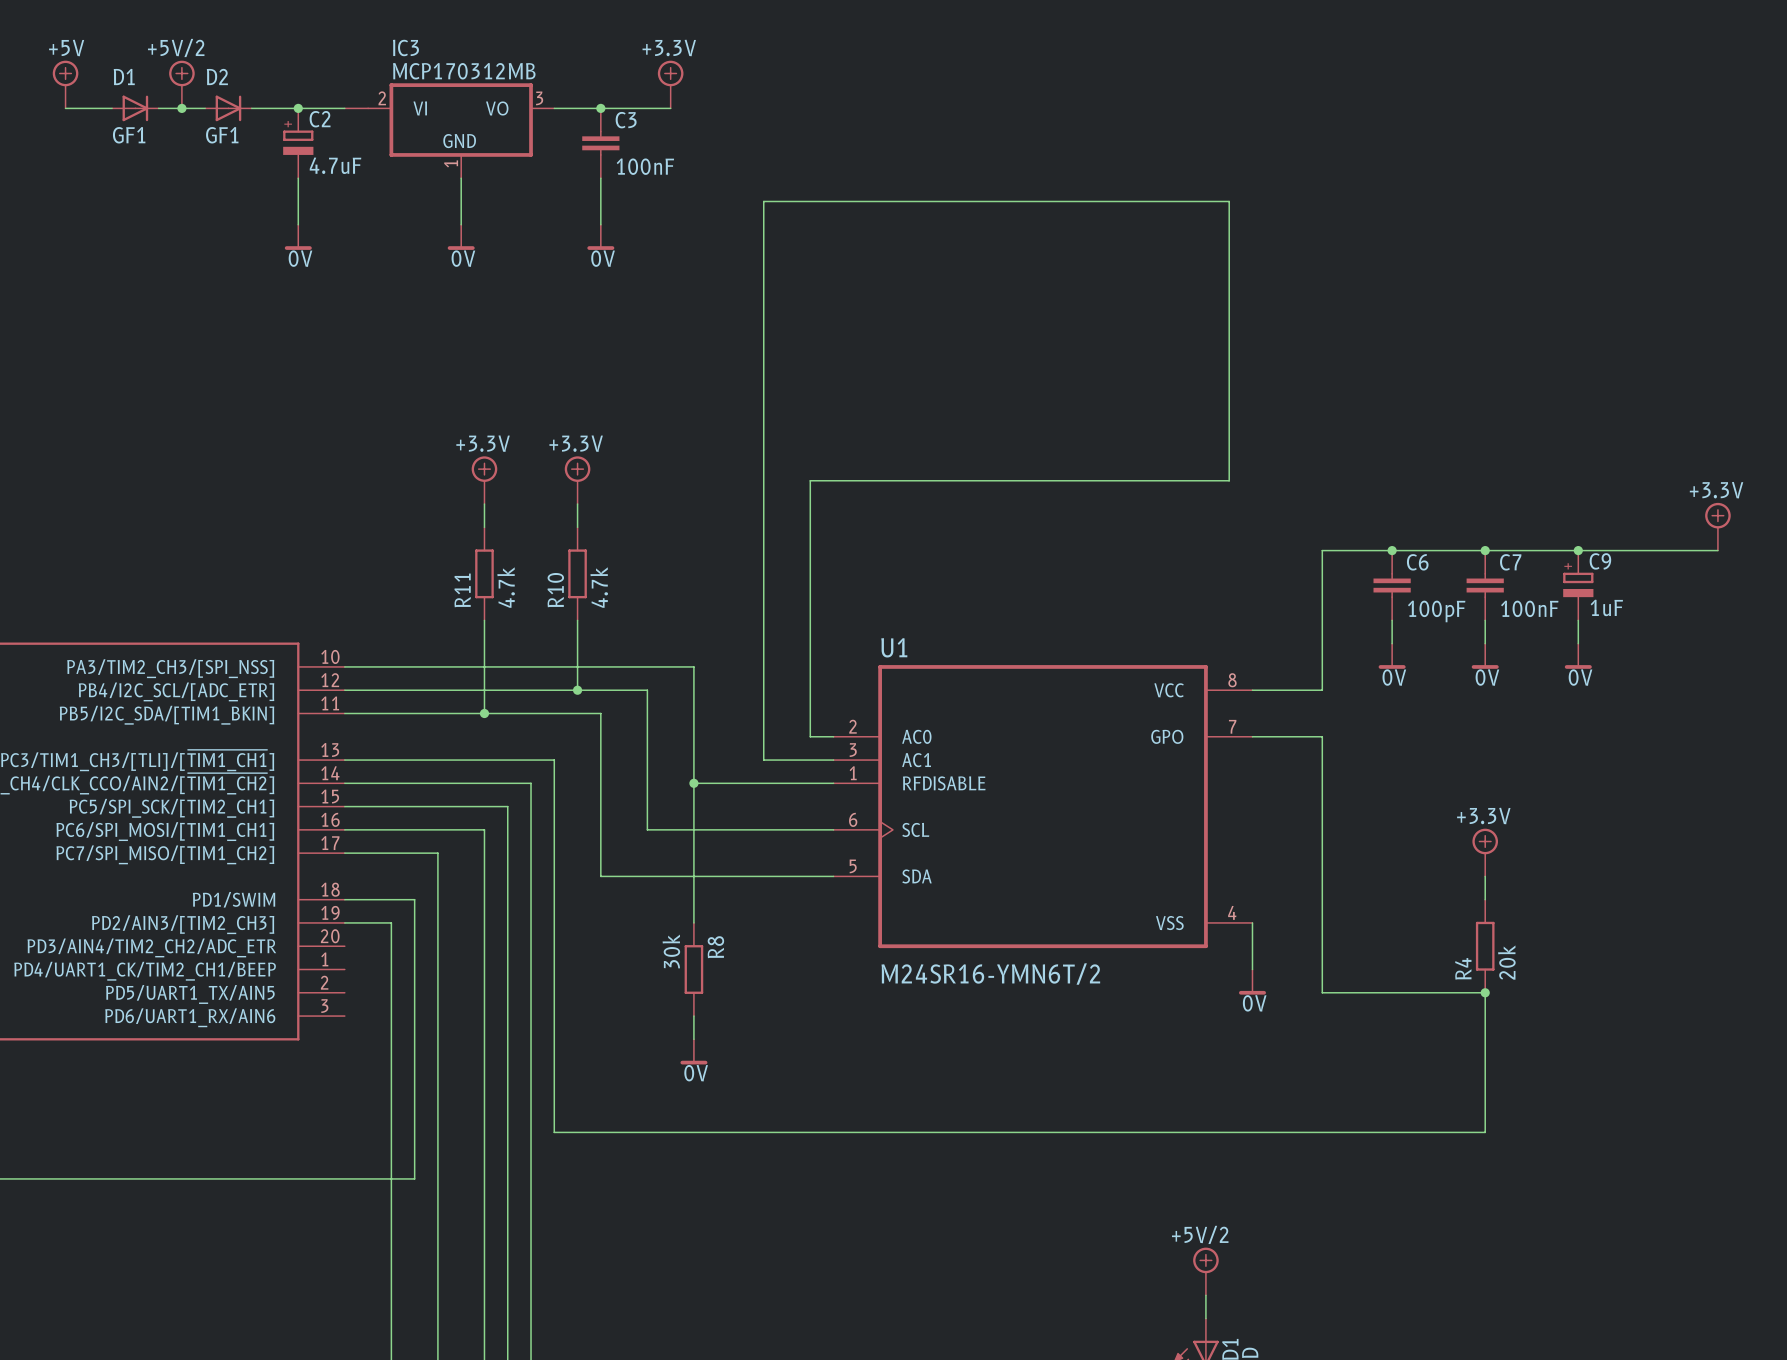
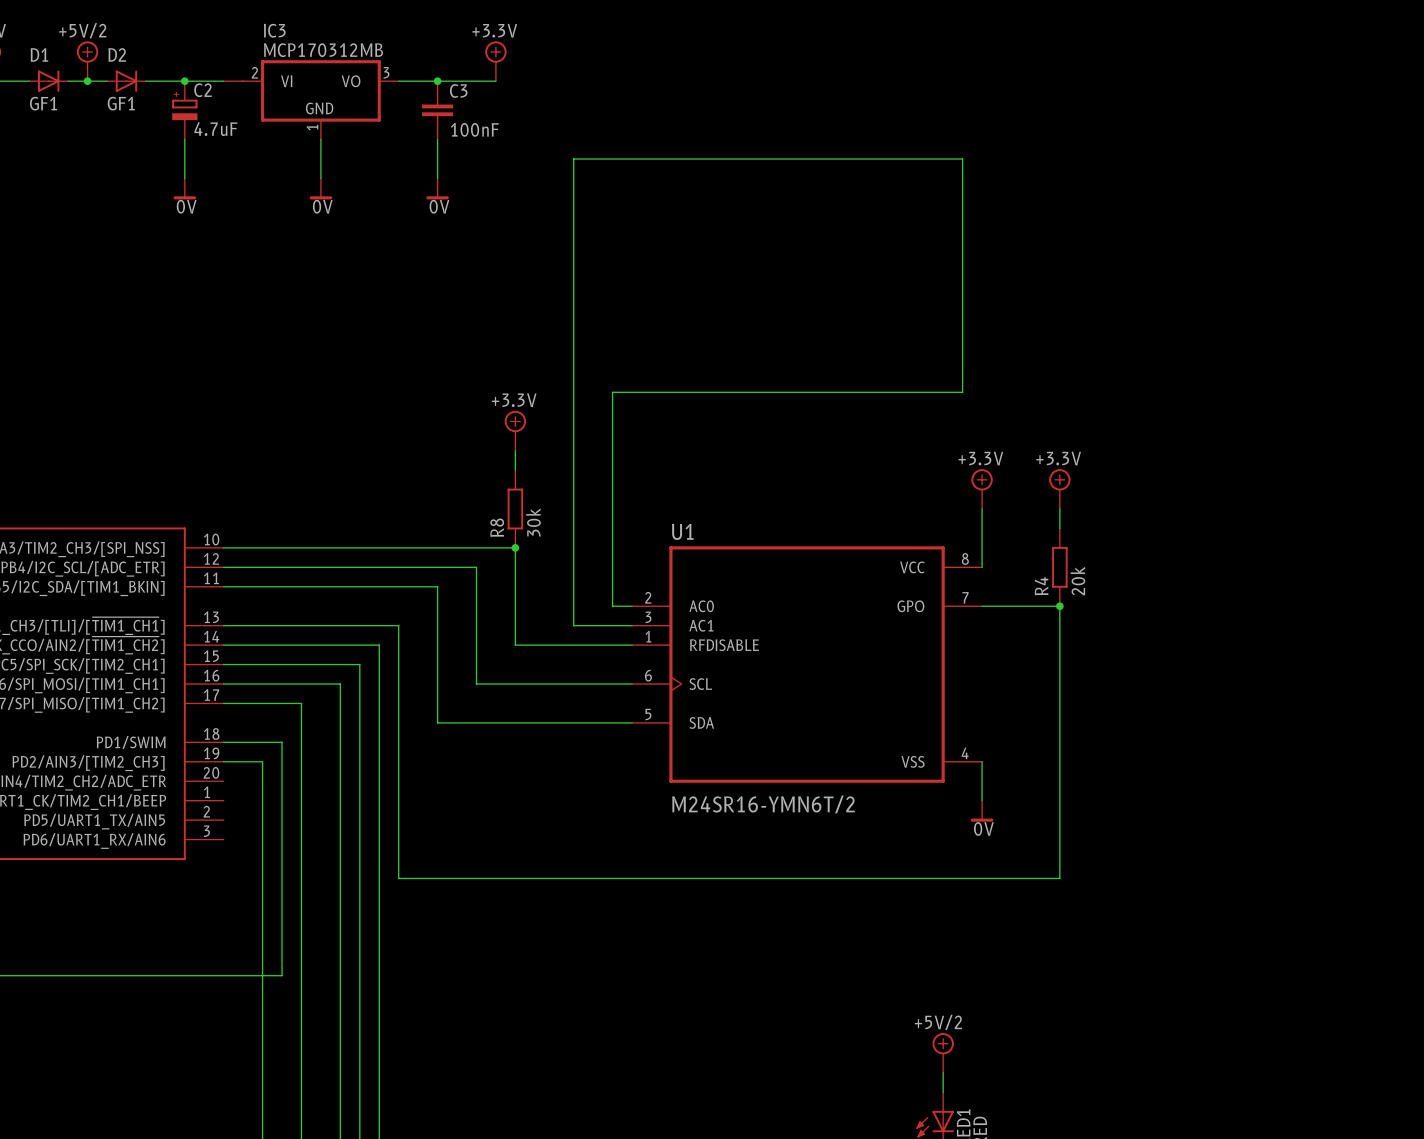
power symbol: +3.3V (484, 480) -> none
power symbol: +3.3V (577, 480) -> none
wire: (484, 504) (484, 527) -> none
wire: (577, 504) (577, 527) -> (515, 450) (515, 470)
power symbol: none -> +3.3V (515, 430)
power symbol: +3.3V (1717, 526) -> none
junction: (1392, 550) -> none
junction: (1485, 550) -> none
junction: (1578, 550) -> none
wire: (1717, 550) (1322, 550) (1322, 690) (1252, 690) -> (982, 508) (982, 567)
R11: 4.7k (484, 573) -> none
R10: 4.7k (577, 573) -> none
C6: 100pF (1392, 585) -> none
C7: 100nF (1485, 585) -> none
C9: 1uF (1578, 585) -> none
power symbol: none -> +3.3V (982, 489)
power symbol: none -> +3.3V (1059, 489)
wire: (484, 620) (484, 713) -> none
wire: (577, 620) (577, 690) -> none
wire: (1392, 620) (1392, 643) -> (1059, 508) (1059, 528)
wire: (1485, 620) (1485, 643) -> none
wire: (1578, 620) (1578, 643) -> none
power symbol: 0V (1392, 656) -> none
power symbol: 0V (1485, 656) -> none
power symbol: 0V (1578, 656) -> none
junction: none -> (515, 547)
junction: (577, 690) -> none
junction: (484, 713) -> none
wire: (1322, 736) (1322, 992) (1485, 992) (1485, 1132) (554, 1132) (554, 1062) -> (1040, 606) (1059, 606) (1059, 878) (398, 878)
junction: none -> (1059, 606)
wire: (693, 783) (693, 922) -> none
junction: (693, 783) -> none
power symbol: +3.3V (1485, 852) -> none
wire: (1485, 876) (1485, 899) -> none
R4 position: (1485, 946) -> (1059, 567)
R8 name position: R8 (715, 947) -> R8 (497, 527)
R8 value position: 30k (671, 951) -> 30k (533, 522)
R8 position: (693, 969) -> (515, 508)
junction: (1485, 992) -> none
wire: (693, 1016) (693, 1039) -> none
power symbol: 0V (693, 1051) -> none

